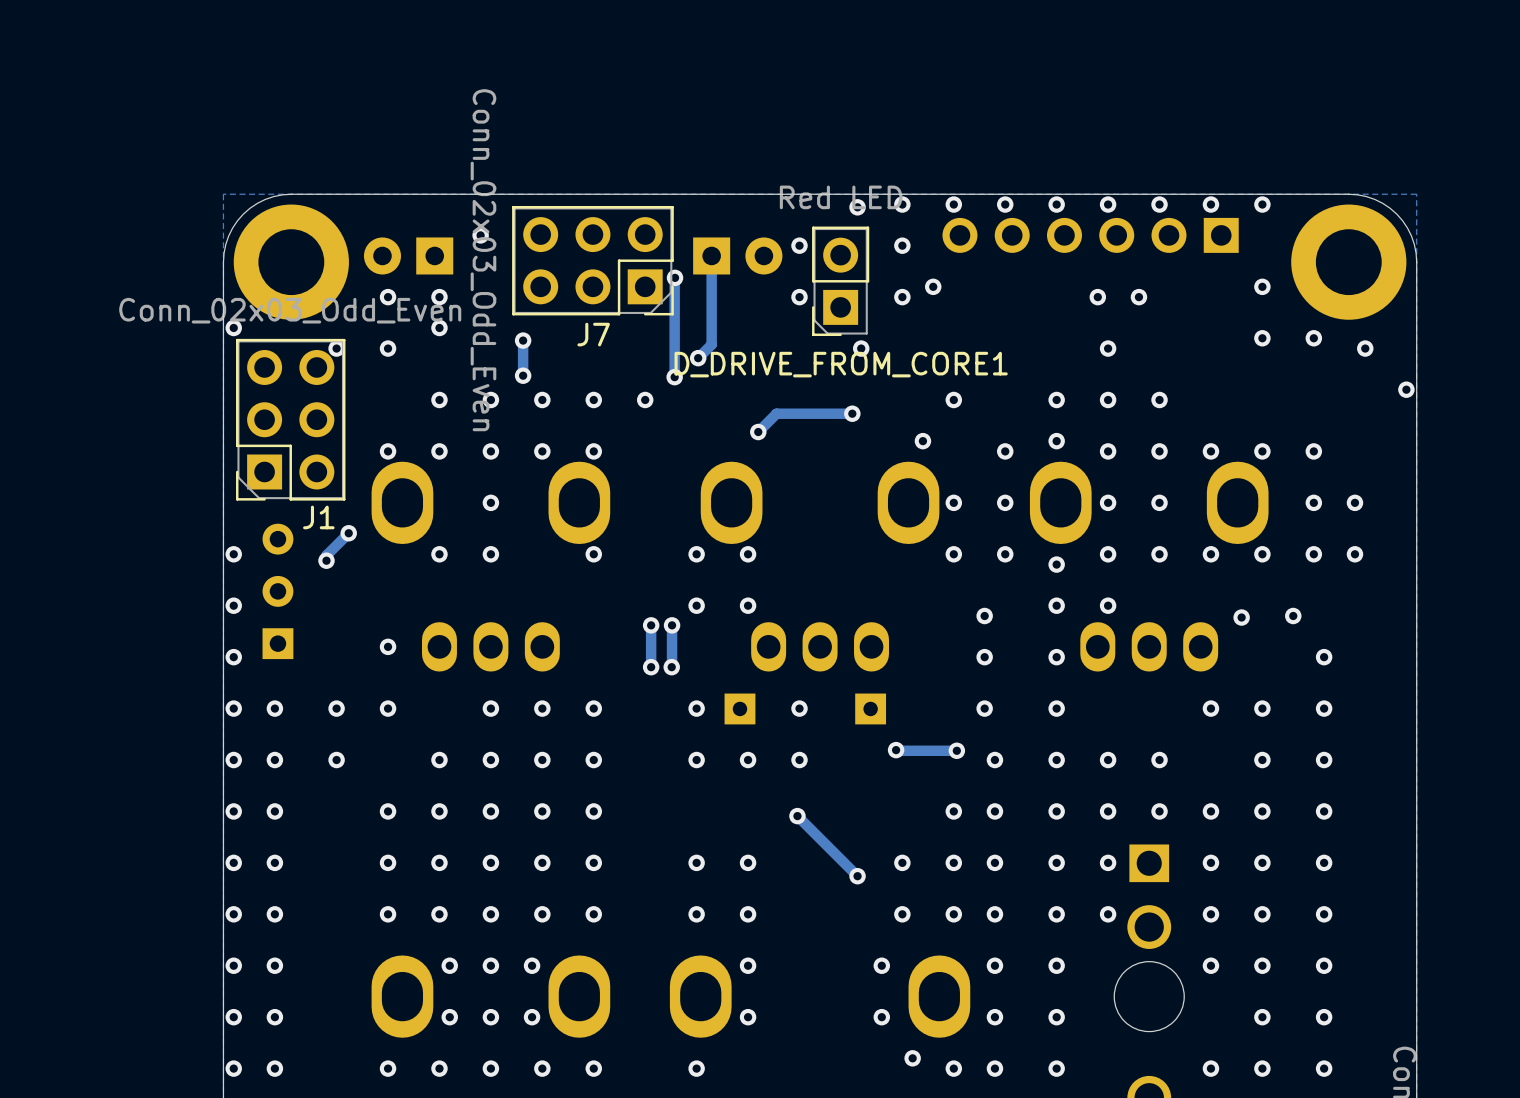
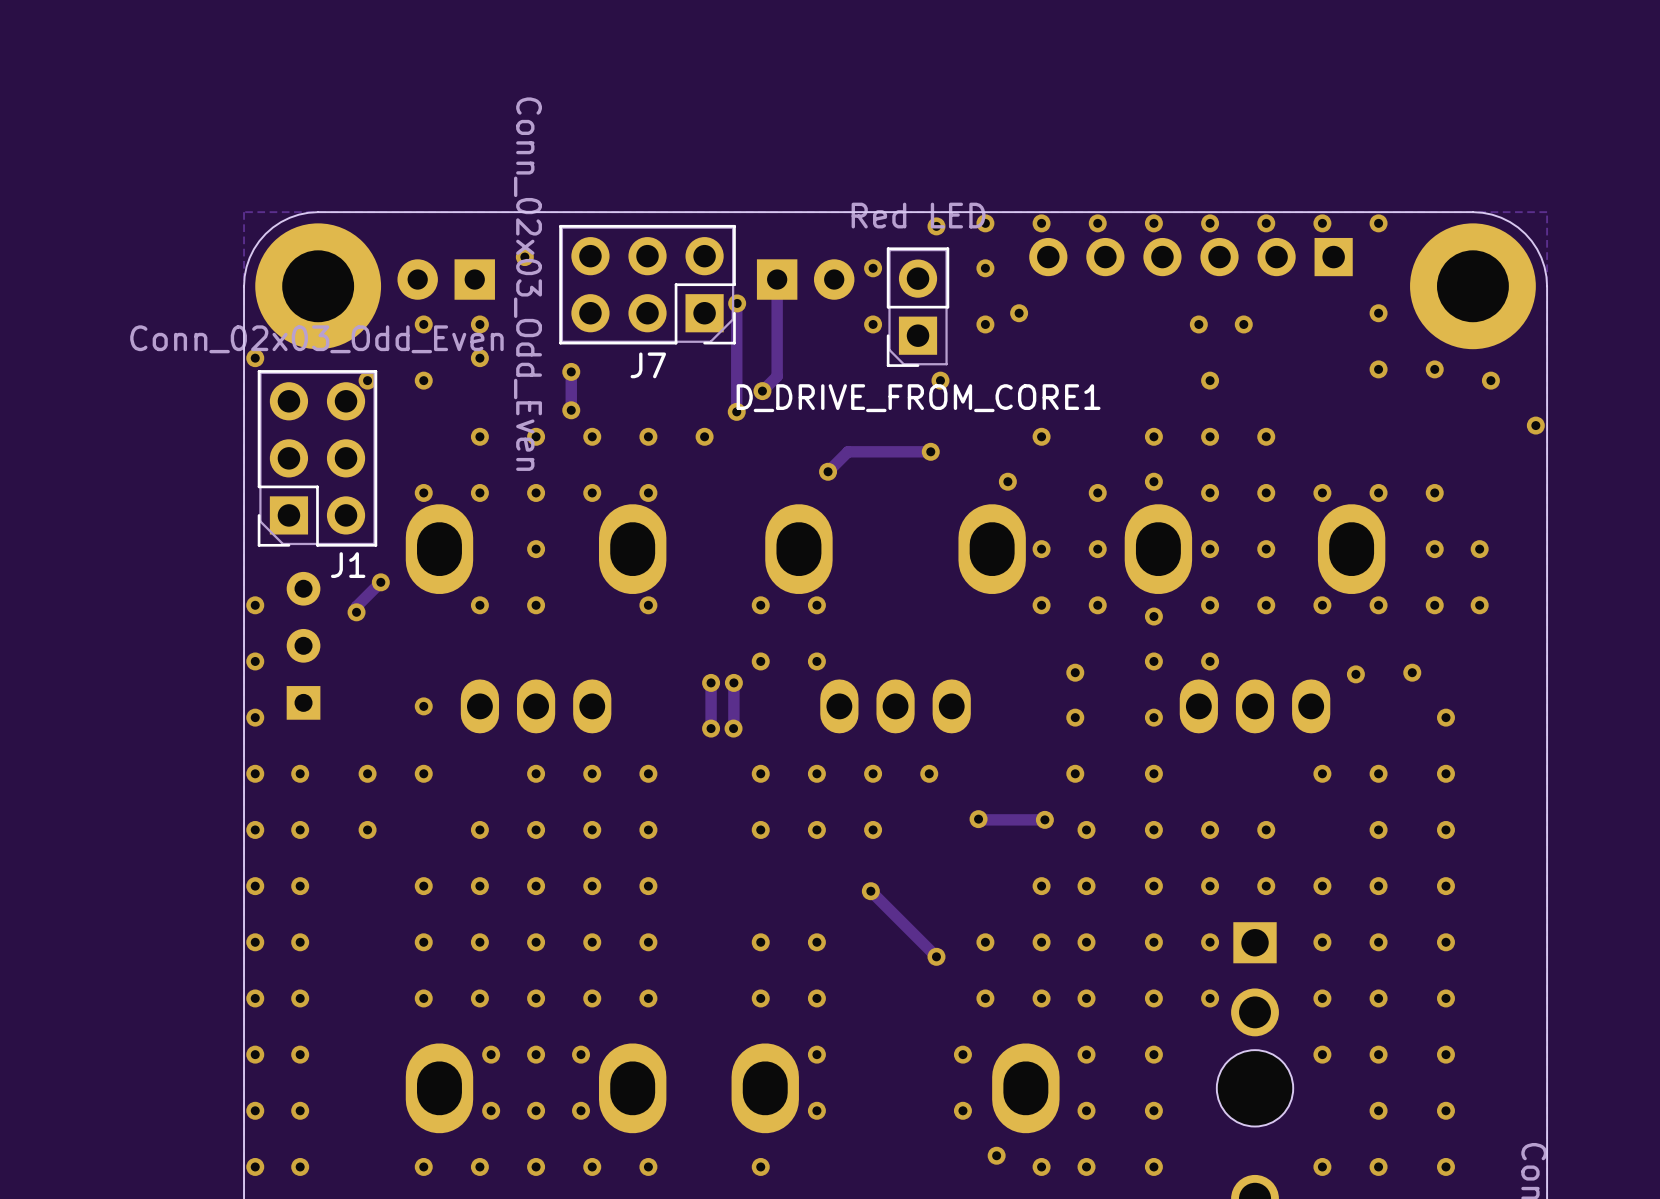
part: (739, 708) -> none
via: none -> (816, 773)
via: none -> (929, 773)
part: (870, 708) -> none

